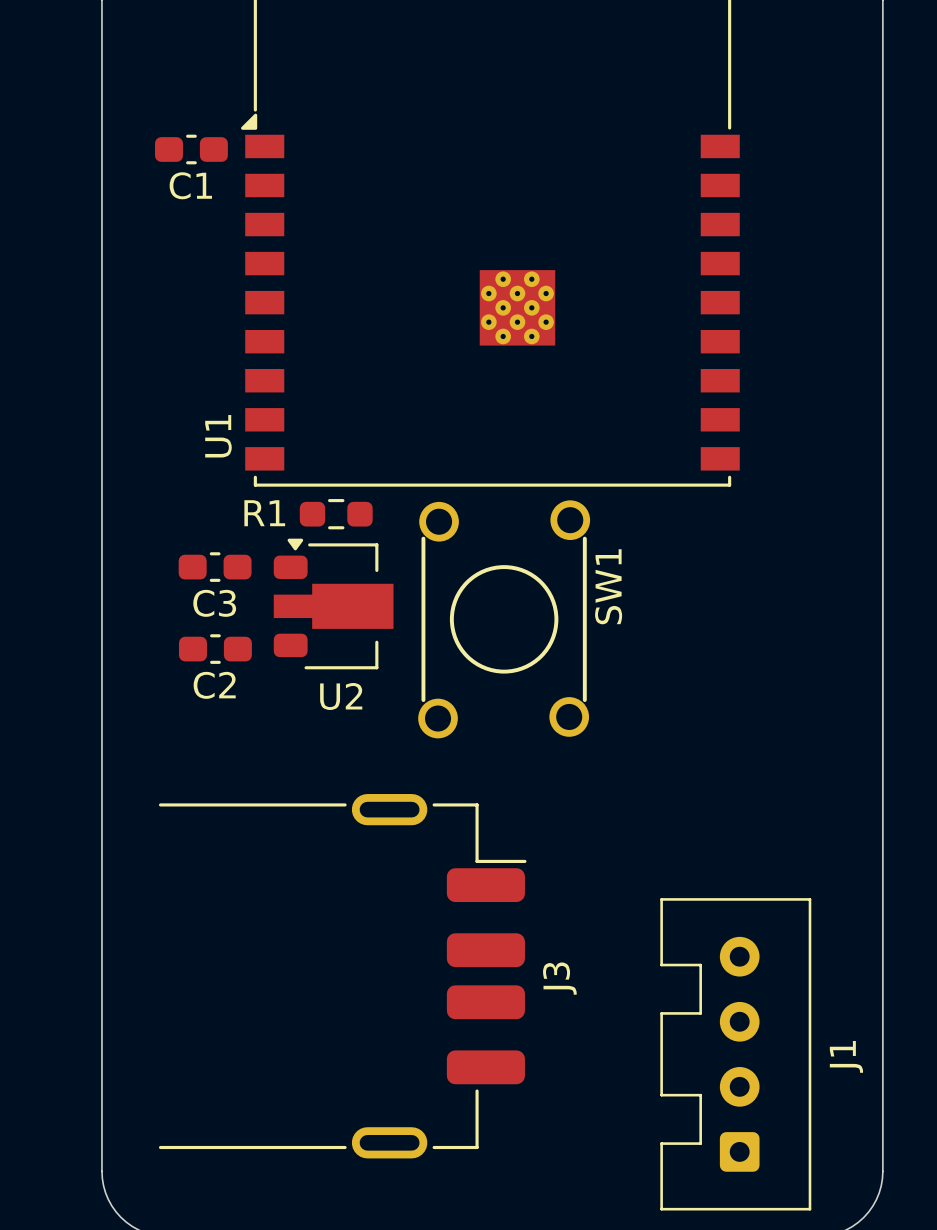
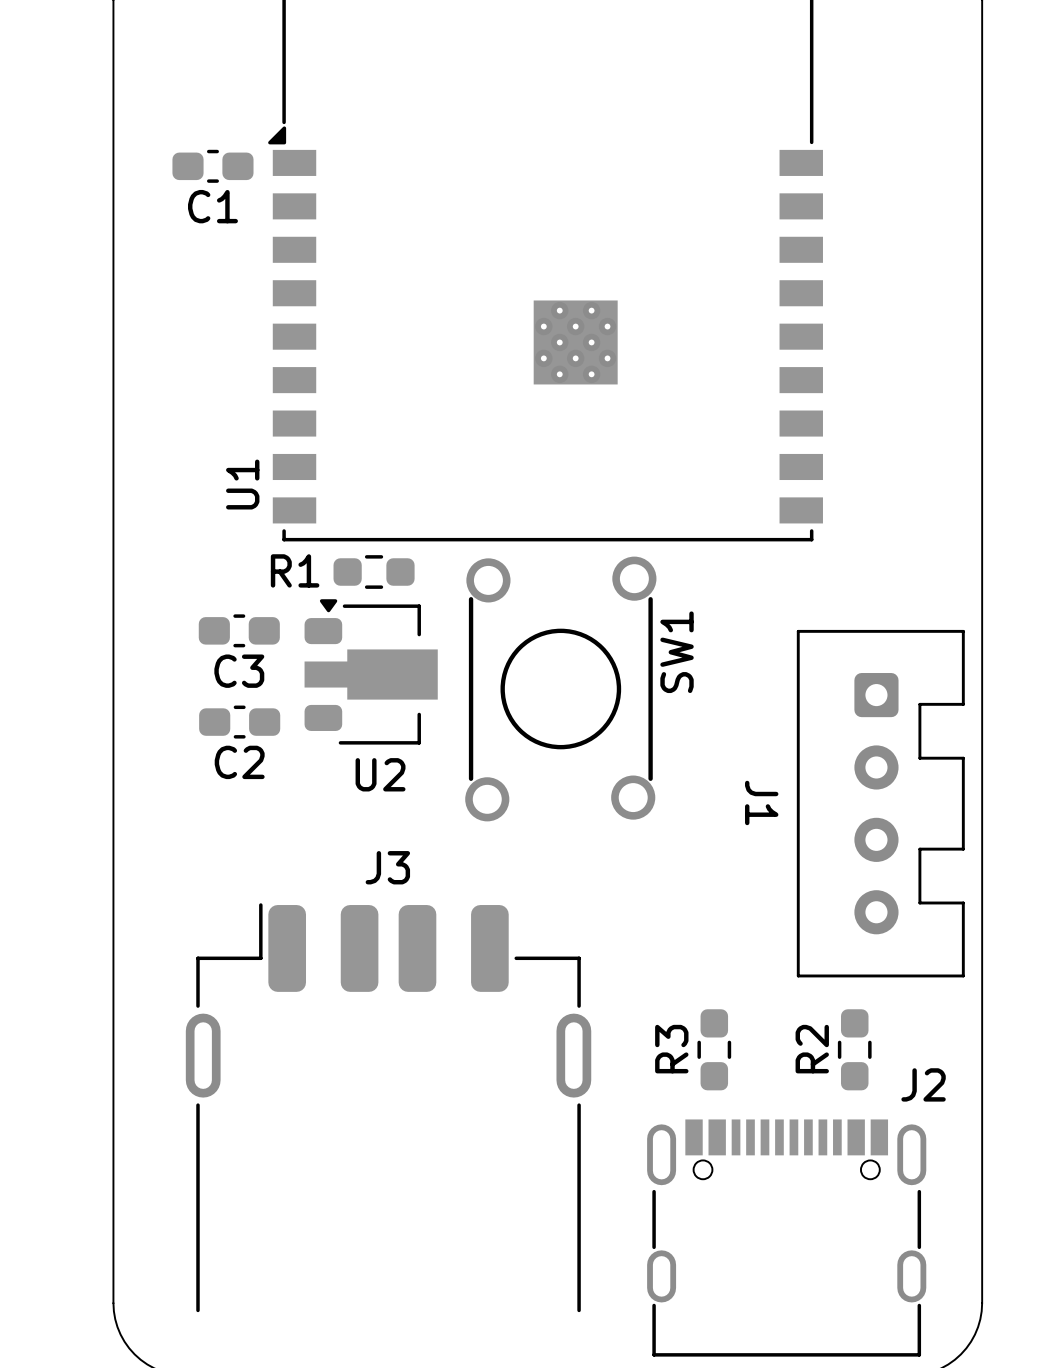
R3: none -> (714, 1049)
R2: none -> (854, 1049)
J3 rotation: 0° (342, 976) -> 90° counterclockwise (388, 1107)
J1 rotation: 0° (735, 1054) -> 180° (880, 803)
J1 position: (735, 1054) -> (880, 803)
J2: none -> (786, 1238)

